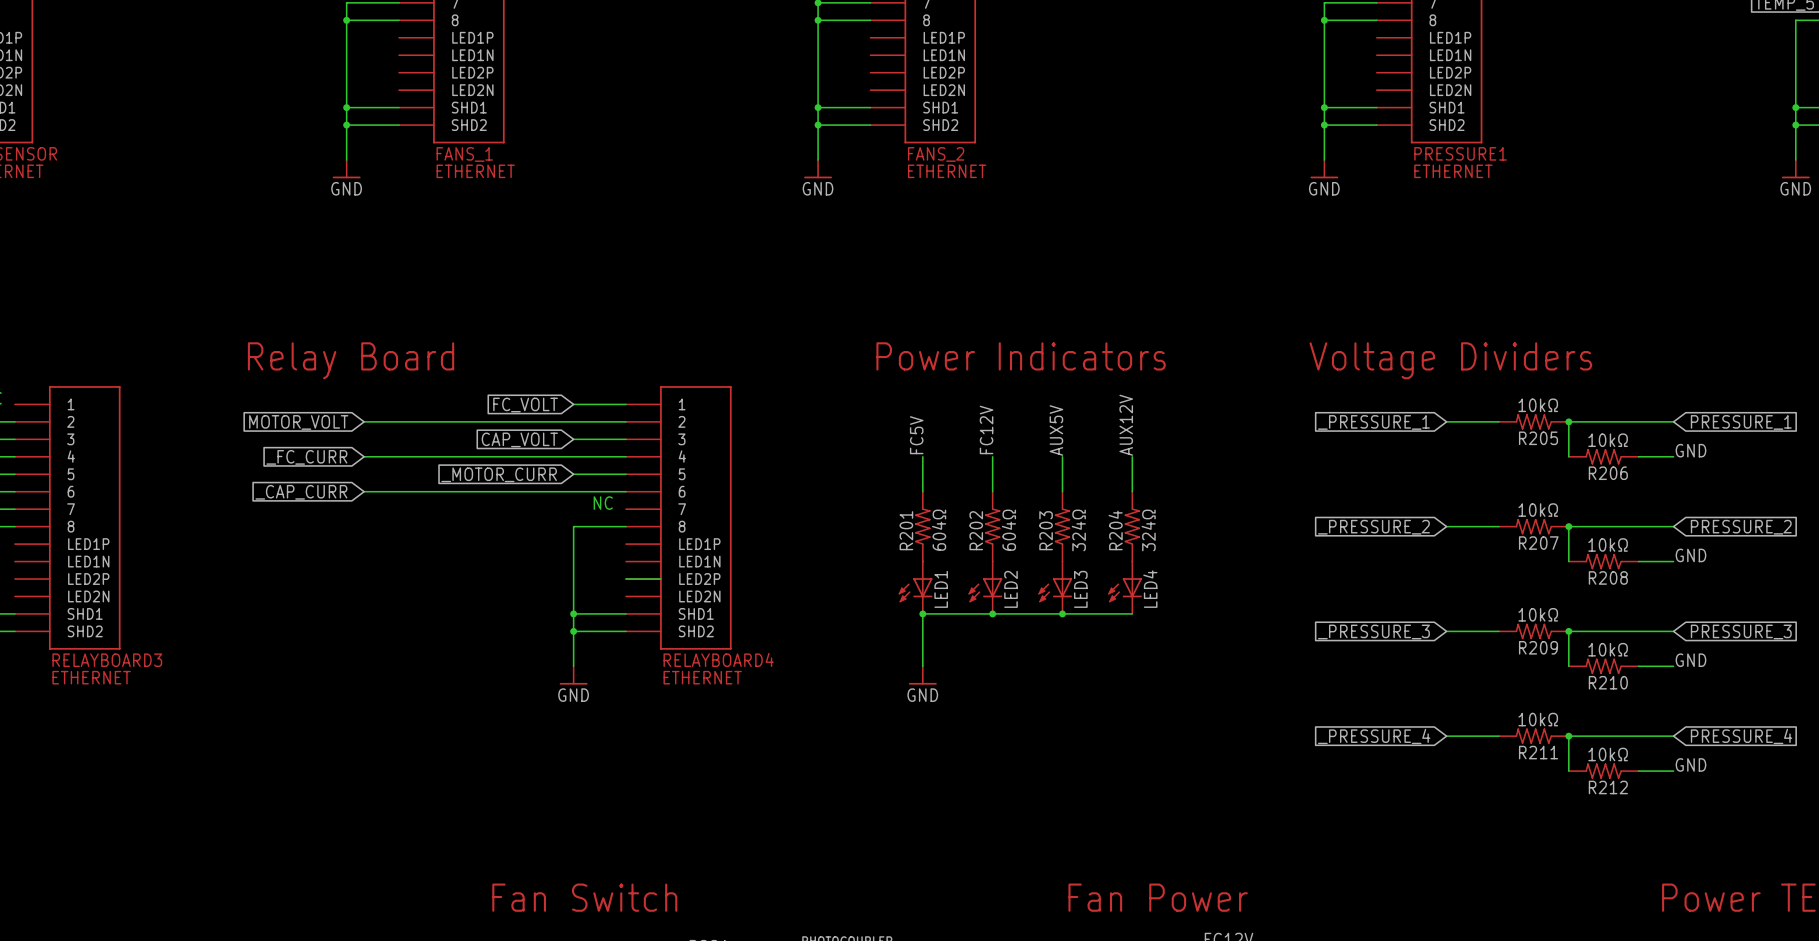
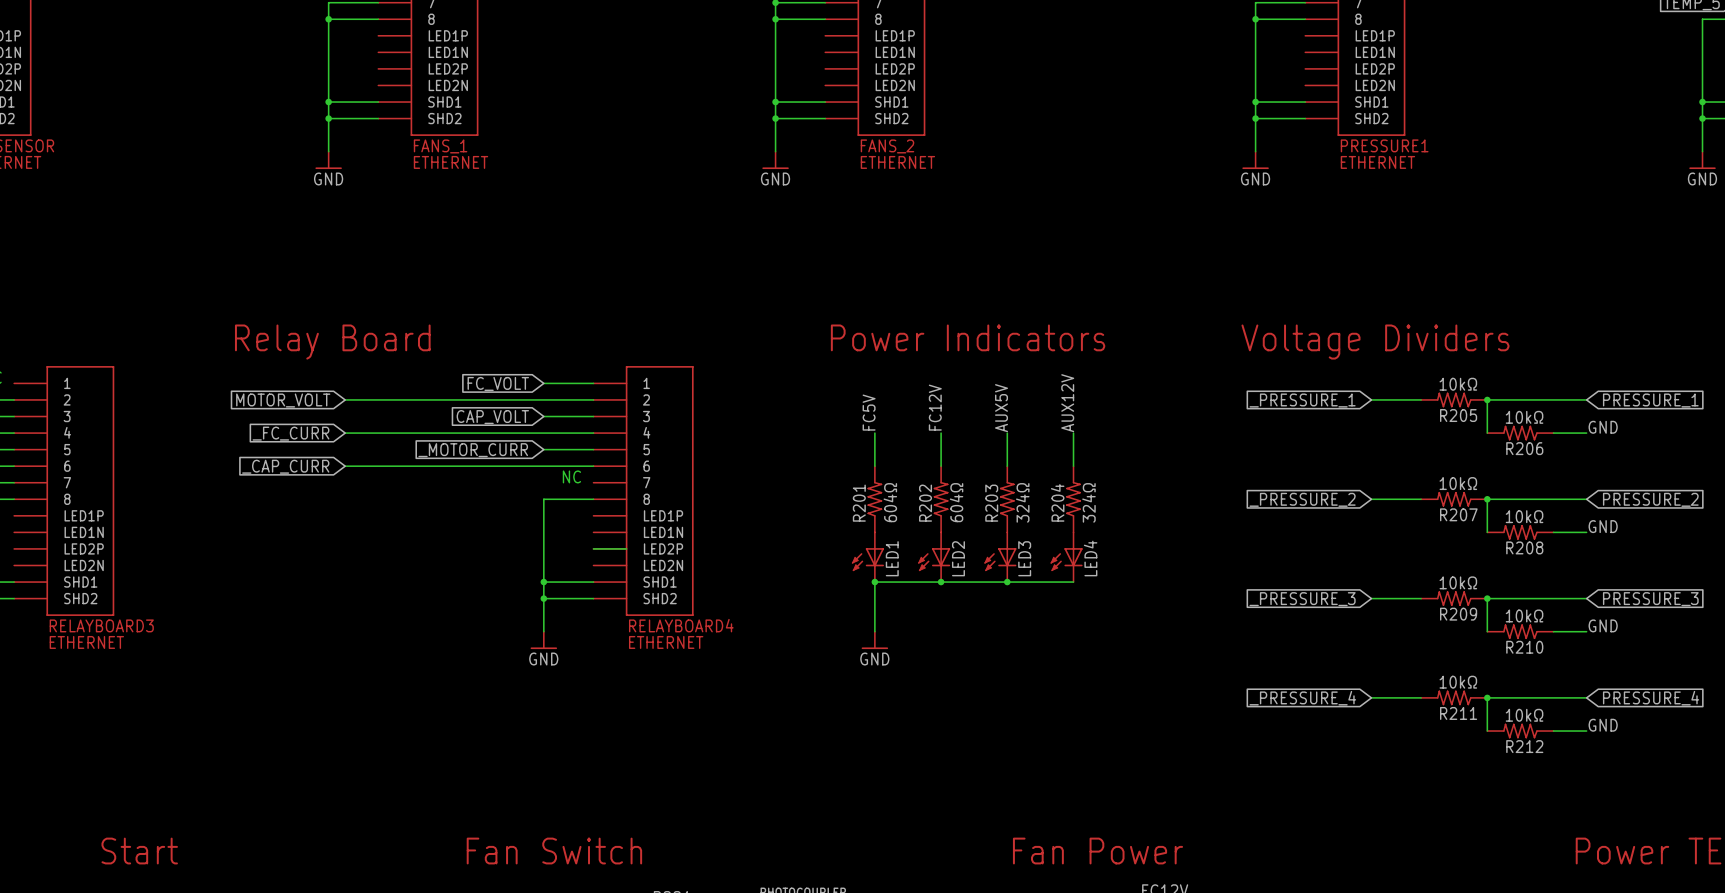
text: none -> Start (139, 851)

